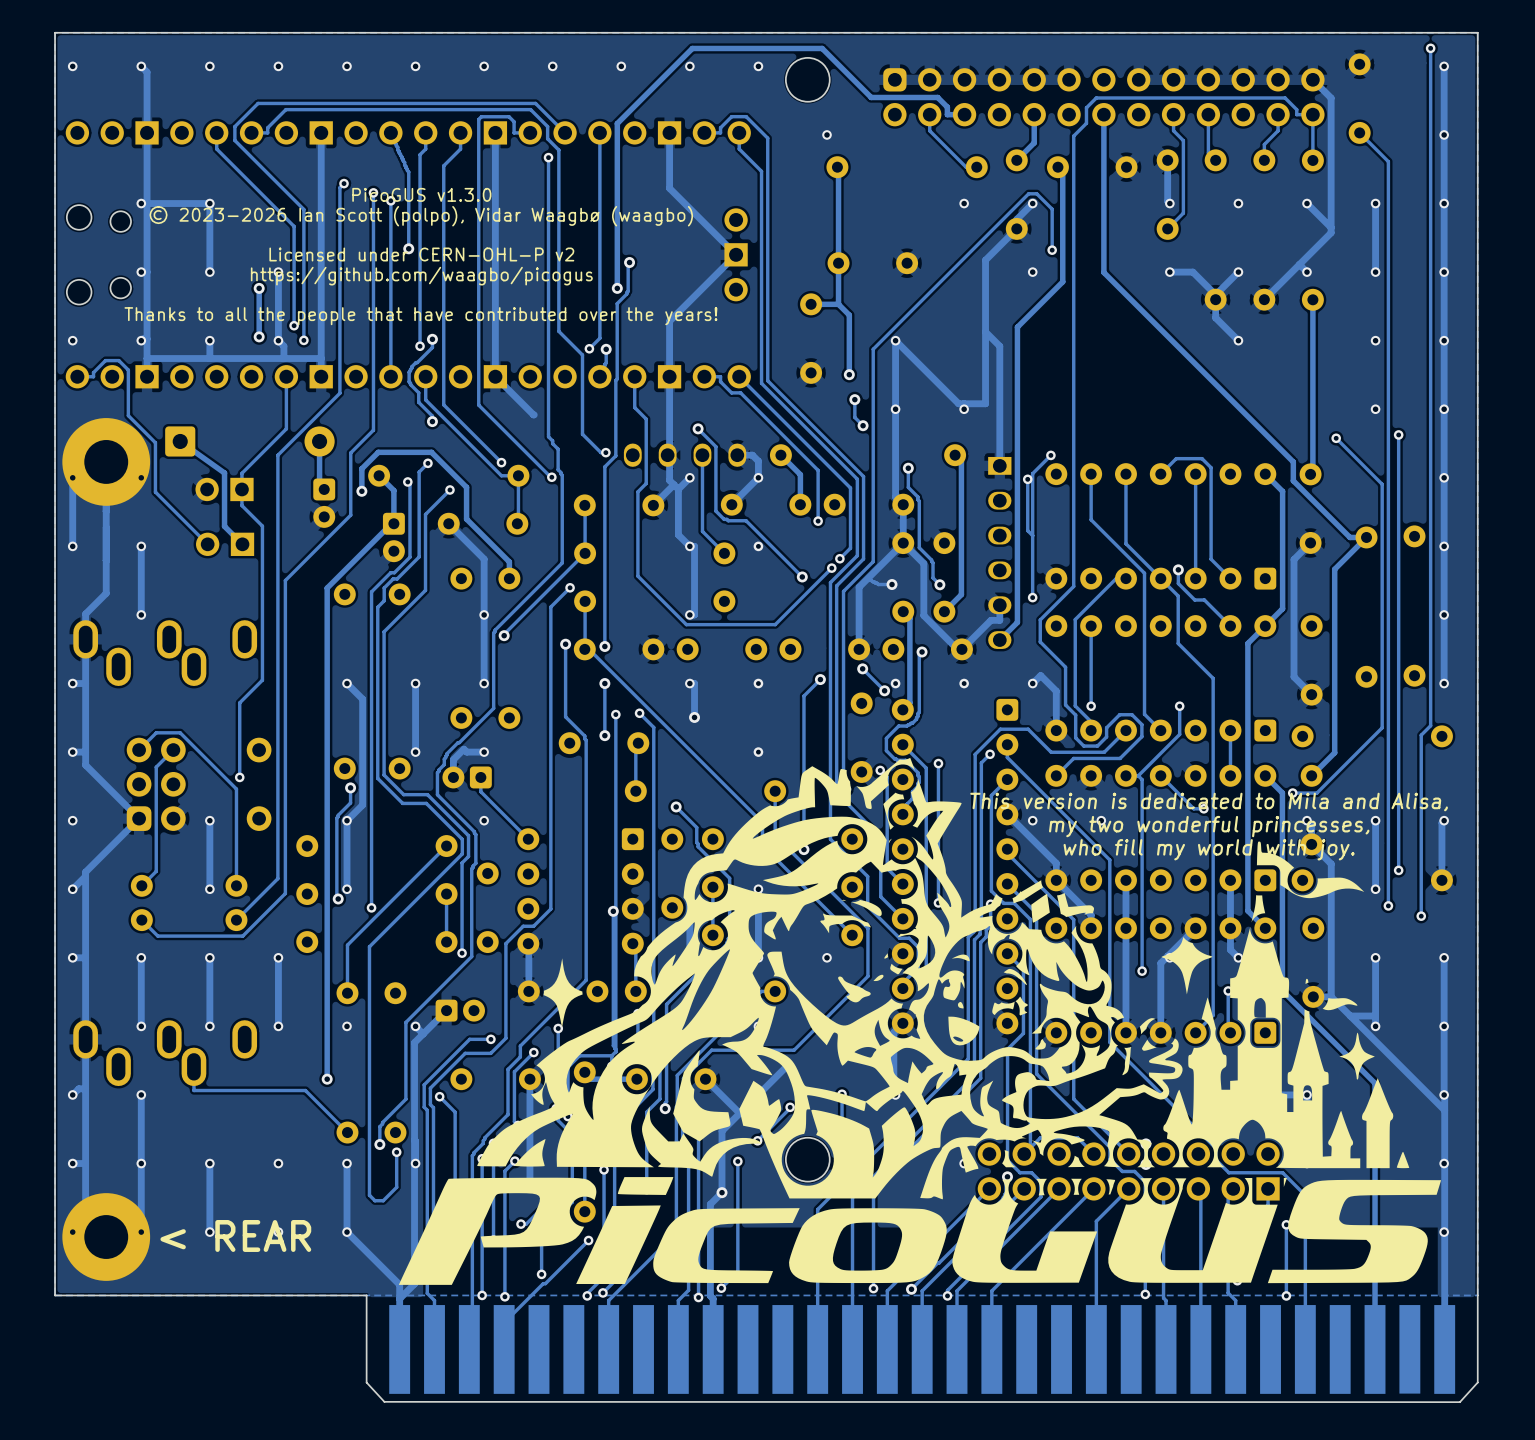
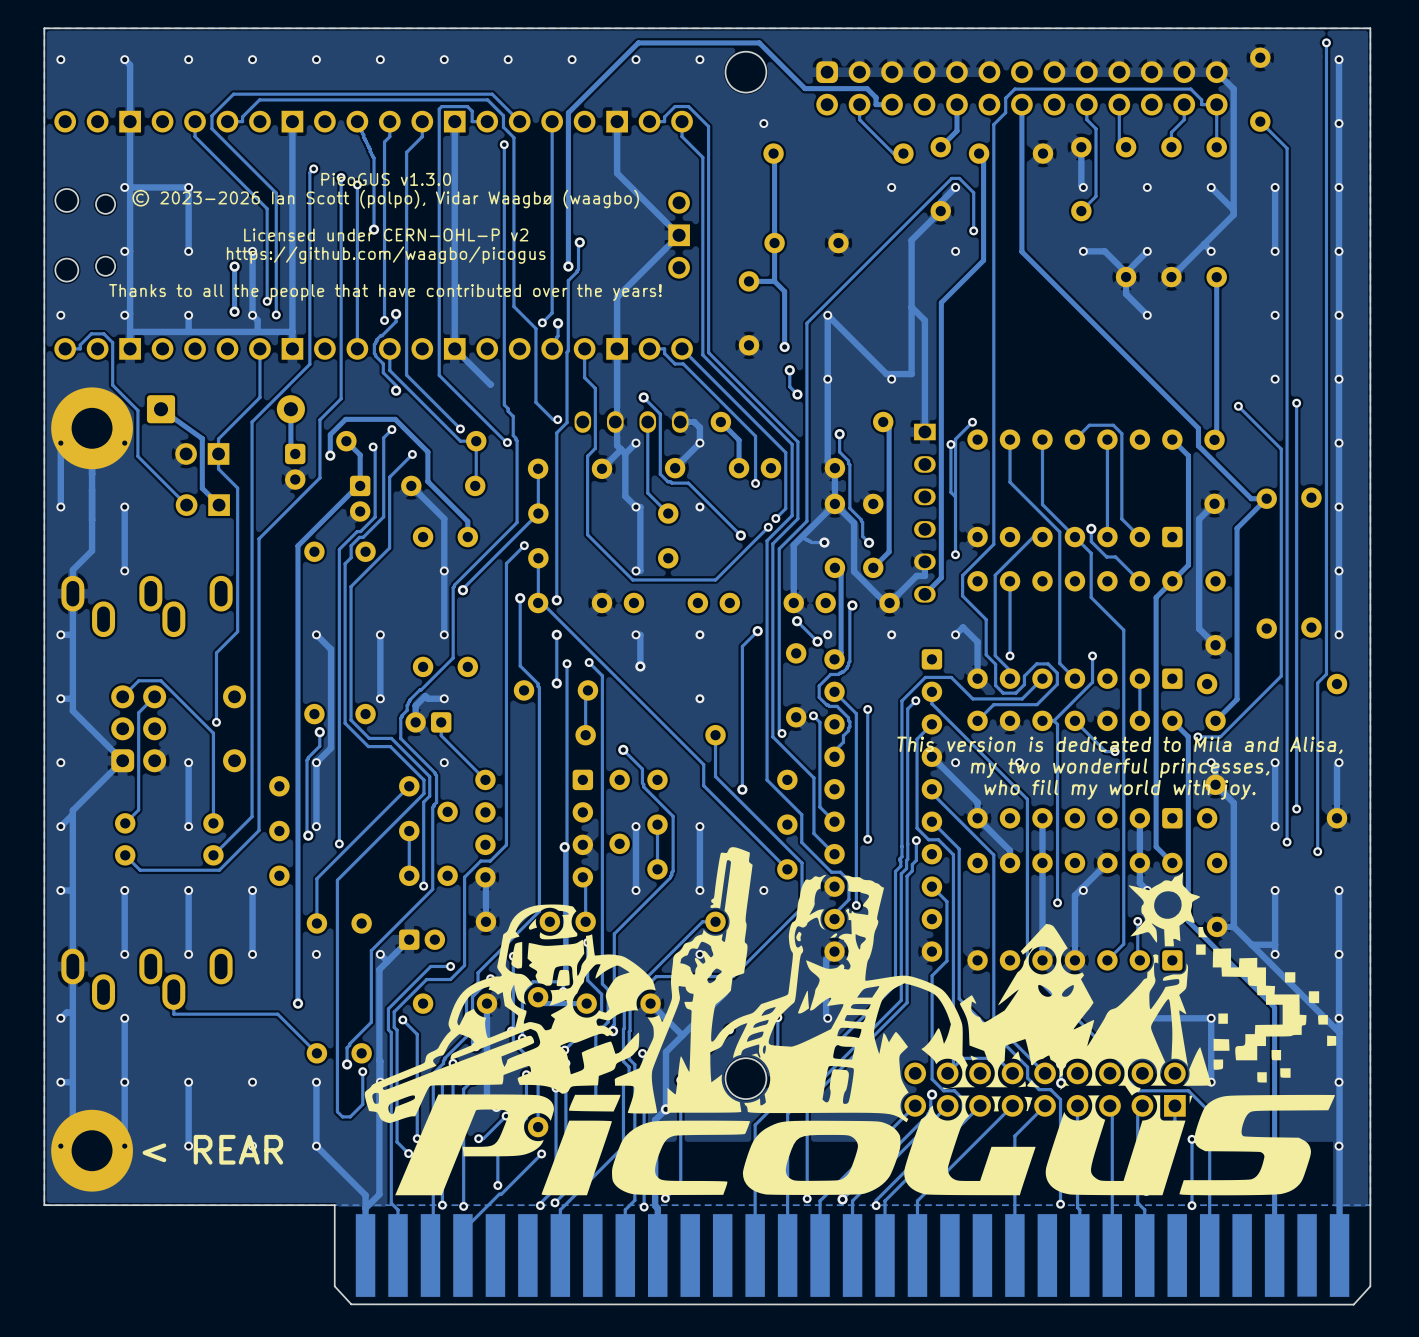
drawing: [398, 757, 1375, 1285] -> none
drawing: none -> [364, 847, 1337, 1196]
drawing shape: [1362, 1078, 1394, 1169] -> [1271, 1050, 1282, 1061]
drawing: [1396, 1151, 1410, 1169] -> none
drawing shape: [1108, 1178, 1278, 1283] -> [1045, 1095, 1186, 1196]
drawing shape: [1267, 1179, 1442, 1284] -> [1179, 1094, 1336, 1196]
drawing shape: [576, 1205, 661, 1285] -> [541, 1120, 612, 1196]
drawing shape: [653, 1208, 800, 1284] -> [611, 1120, 751, 1196]

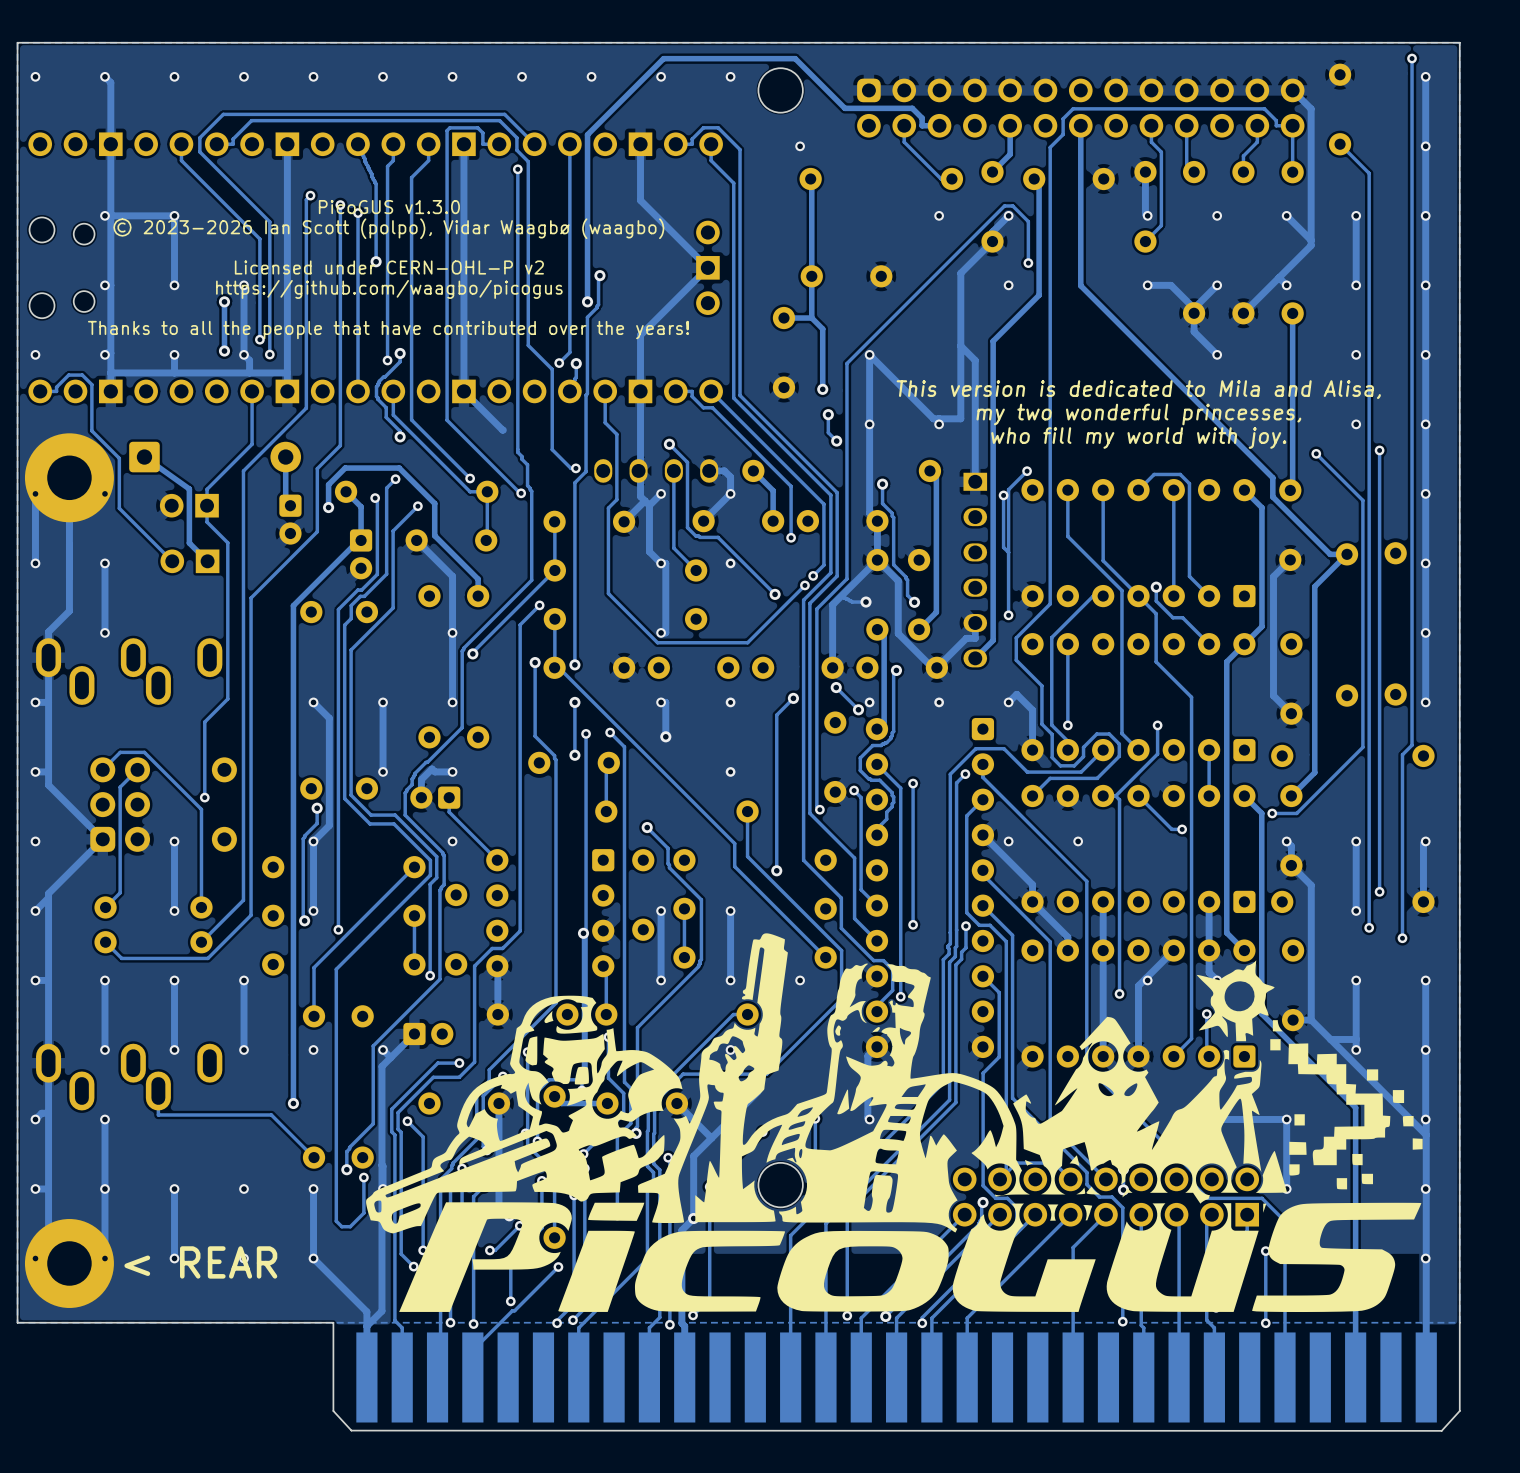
text: none -> This version is dedicated to Mila and Alisa, (1138, 389)
text: none -> my two wonderful princesses, (1138, 414)
text: none -> who fill my world with joy. (1138, 438)
text: This version is dedicated to Mila and Alisa, (1119, 745) -> none
text: my two wonderful princesses, (1120, 768) -> none
text: who fill my world with joy. (1119, 789) -> none

